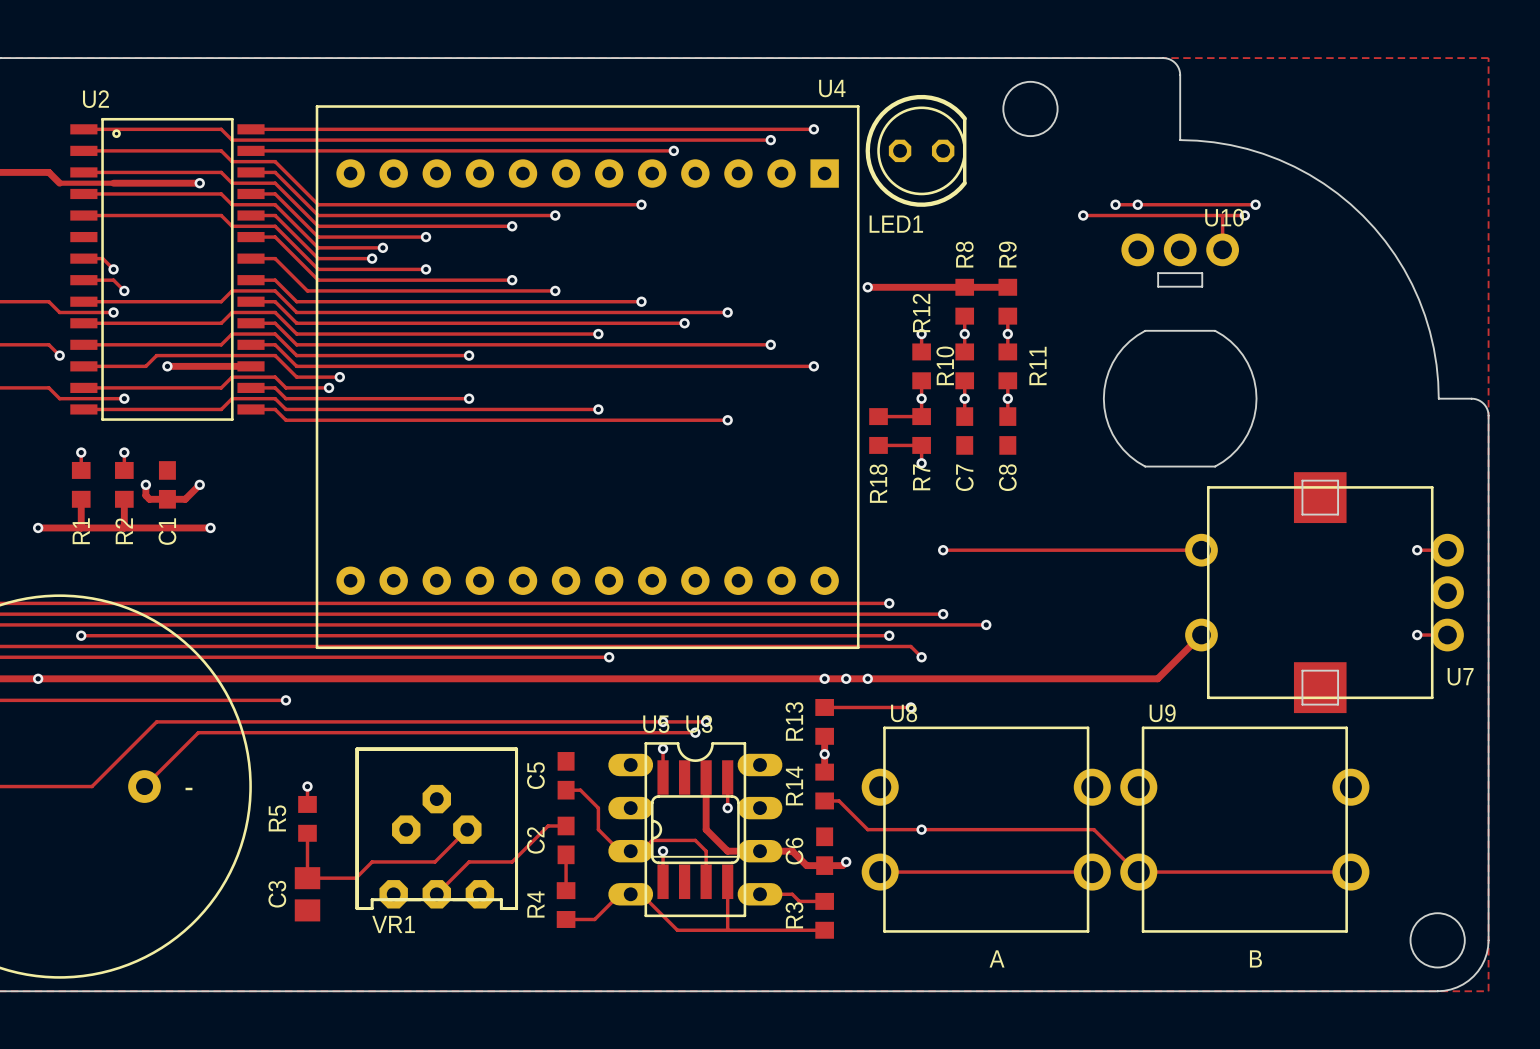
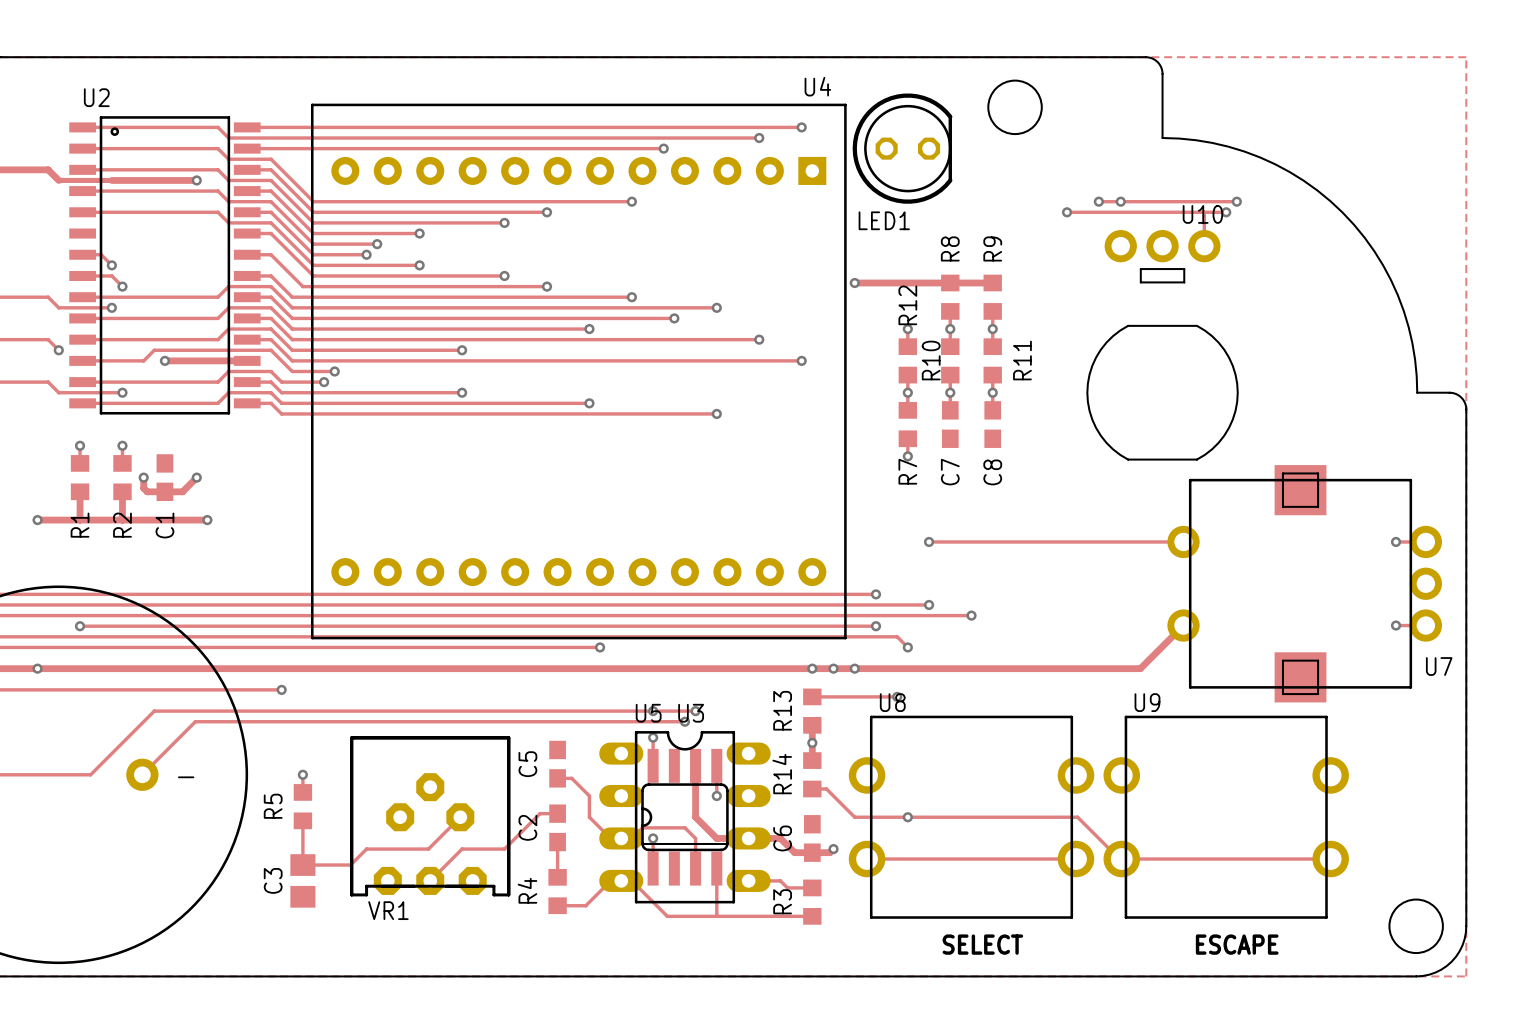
track: (878, 416) (921, 416) -> none
R18: (878, 431) -> none
track: (878, 445) (921, 445) -> none
text: A (997, 958) -> SELECT (982, 944)
text: B (1255, 958) -> ESCAPE (1237, 944)

